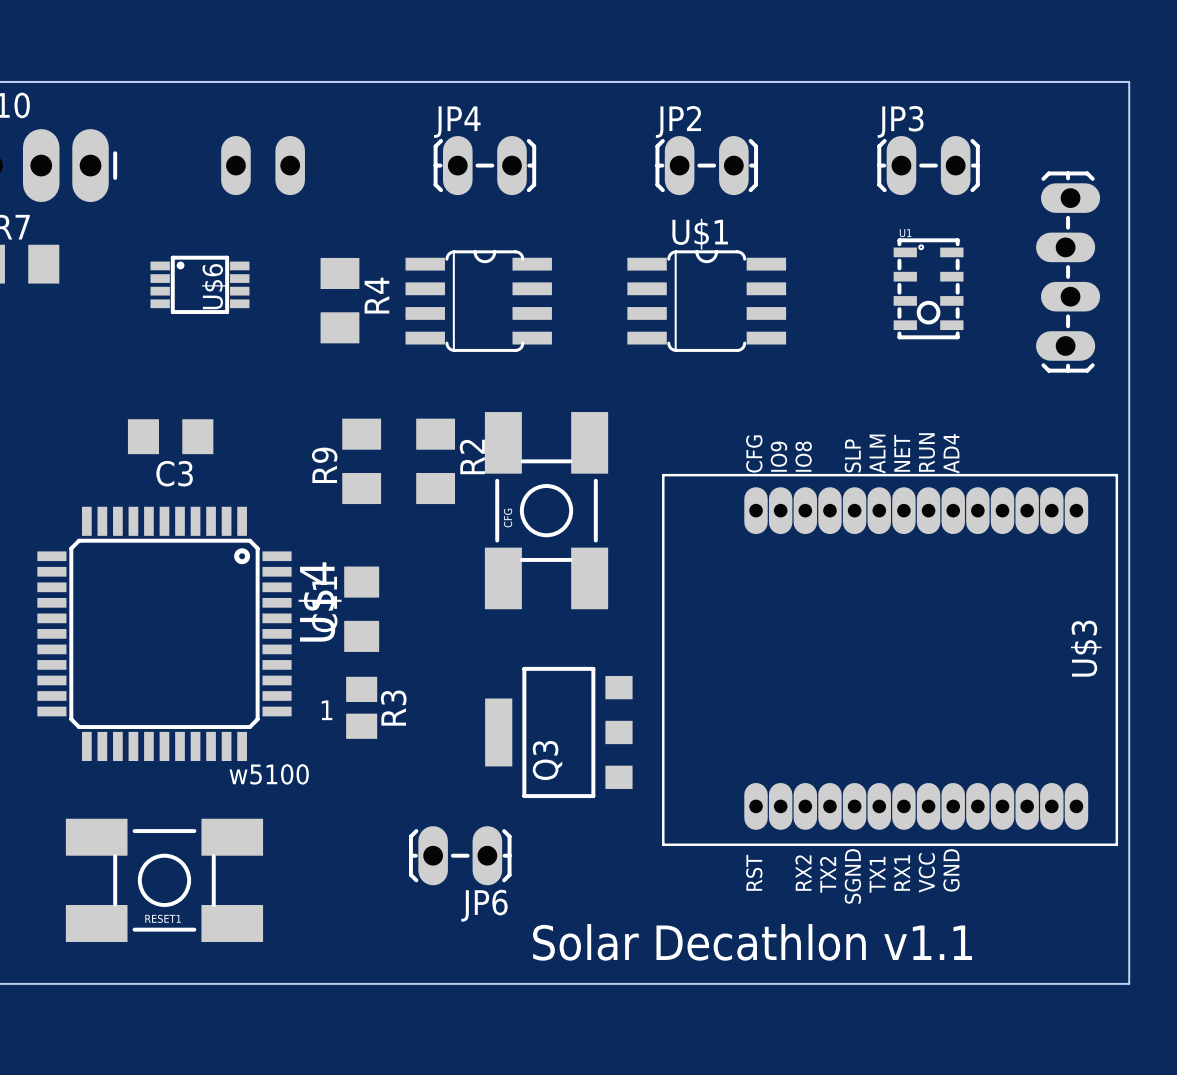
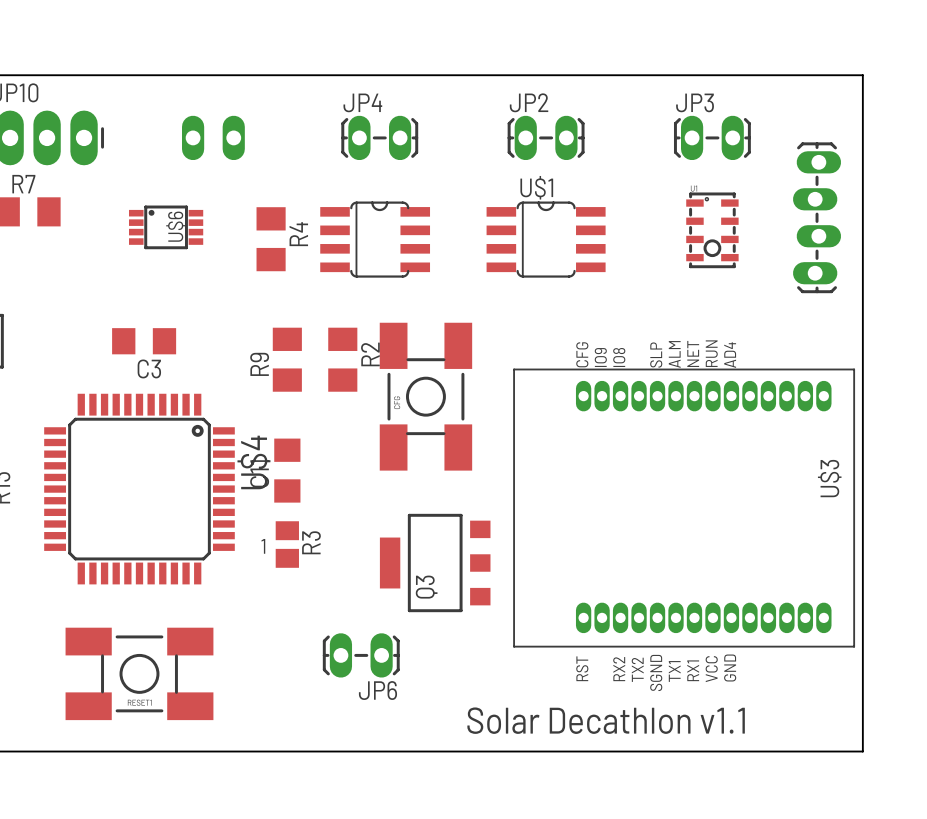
U$3 footprint: [662, 473, 1119, 846] -> [513, 368, 856, 648]
text: w5100 (269, 774) -> none

